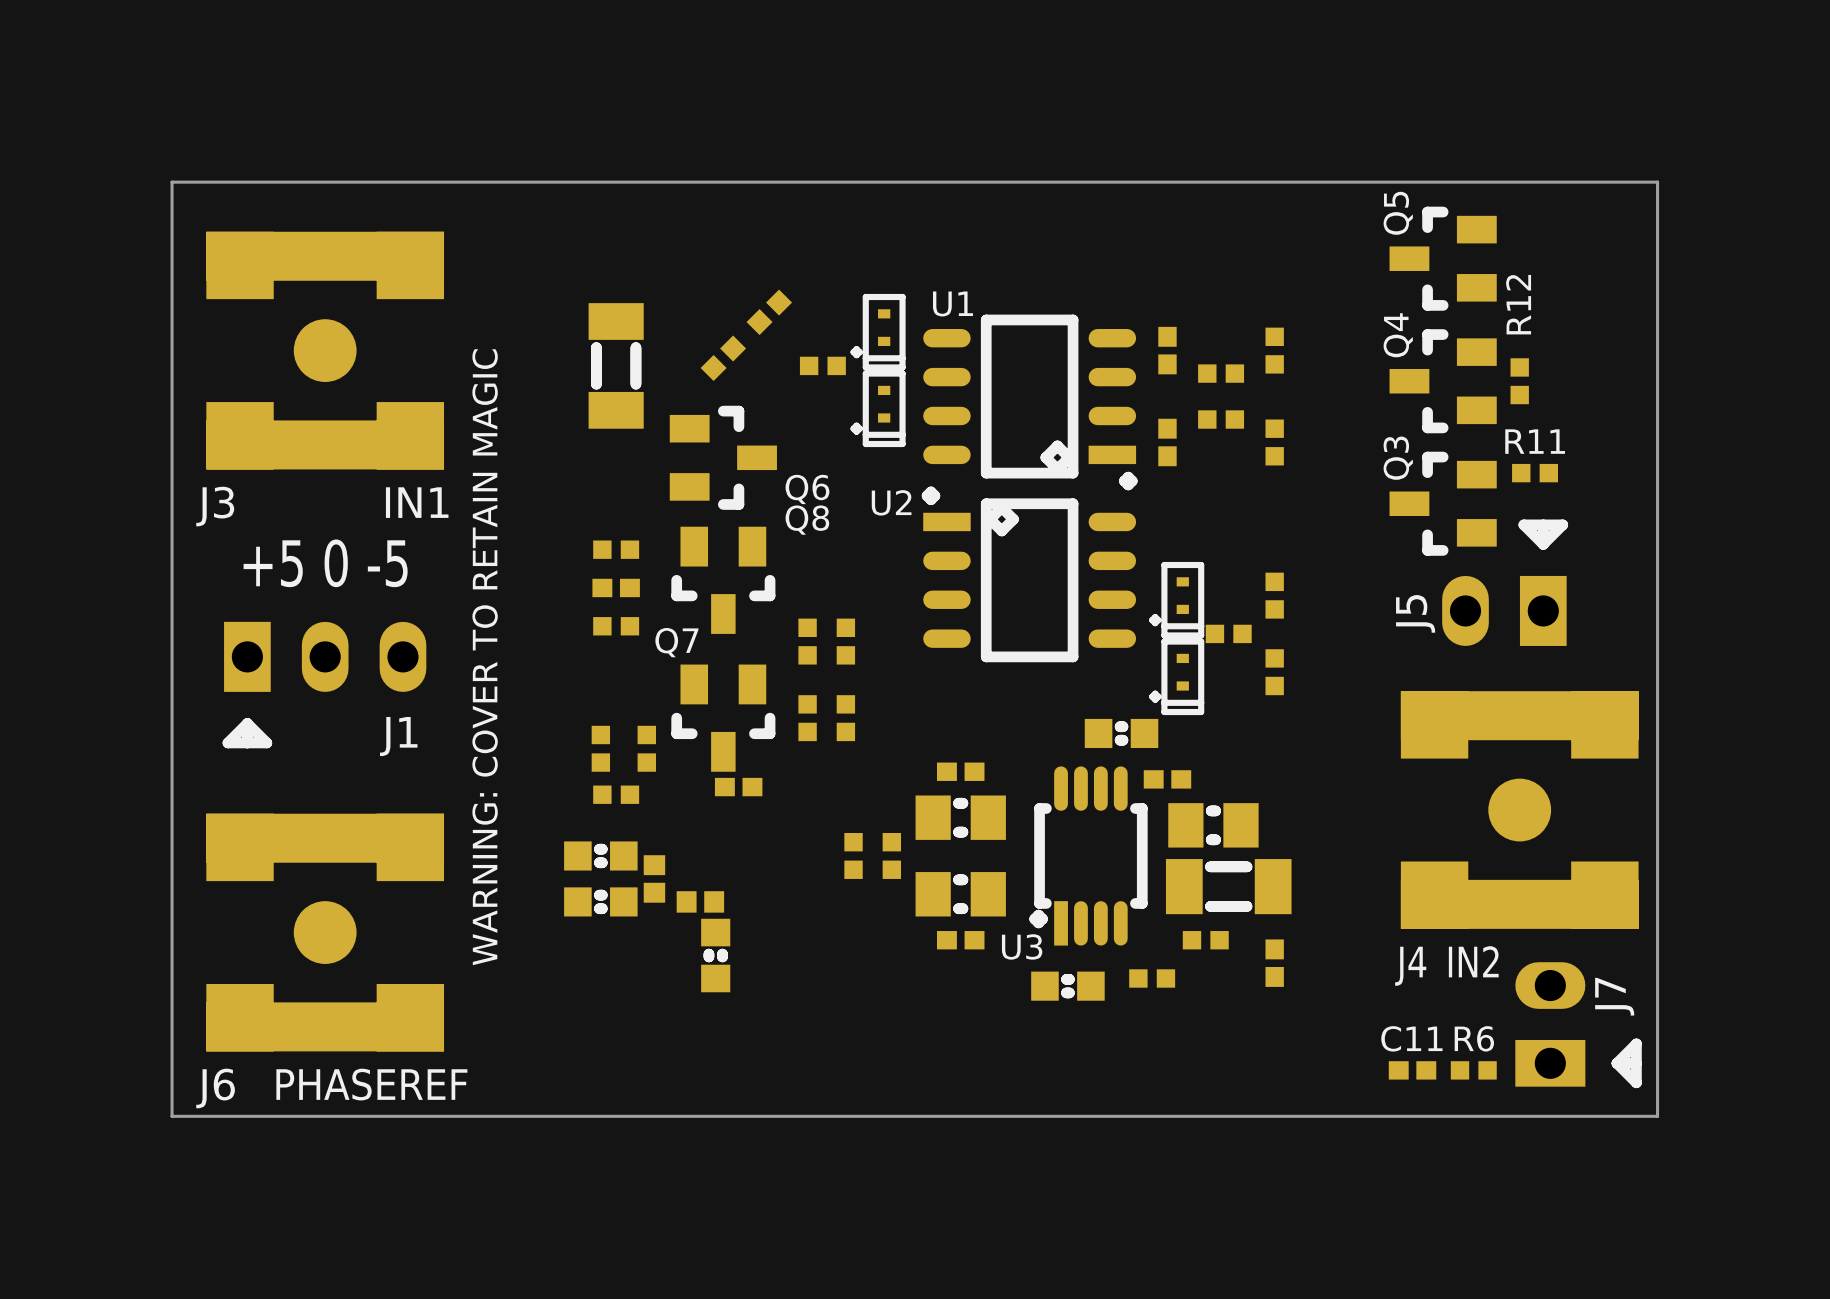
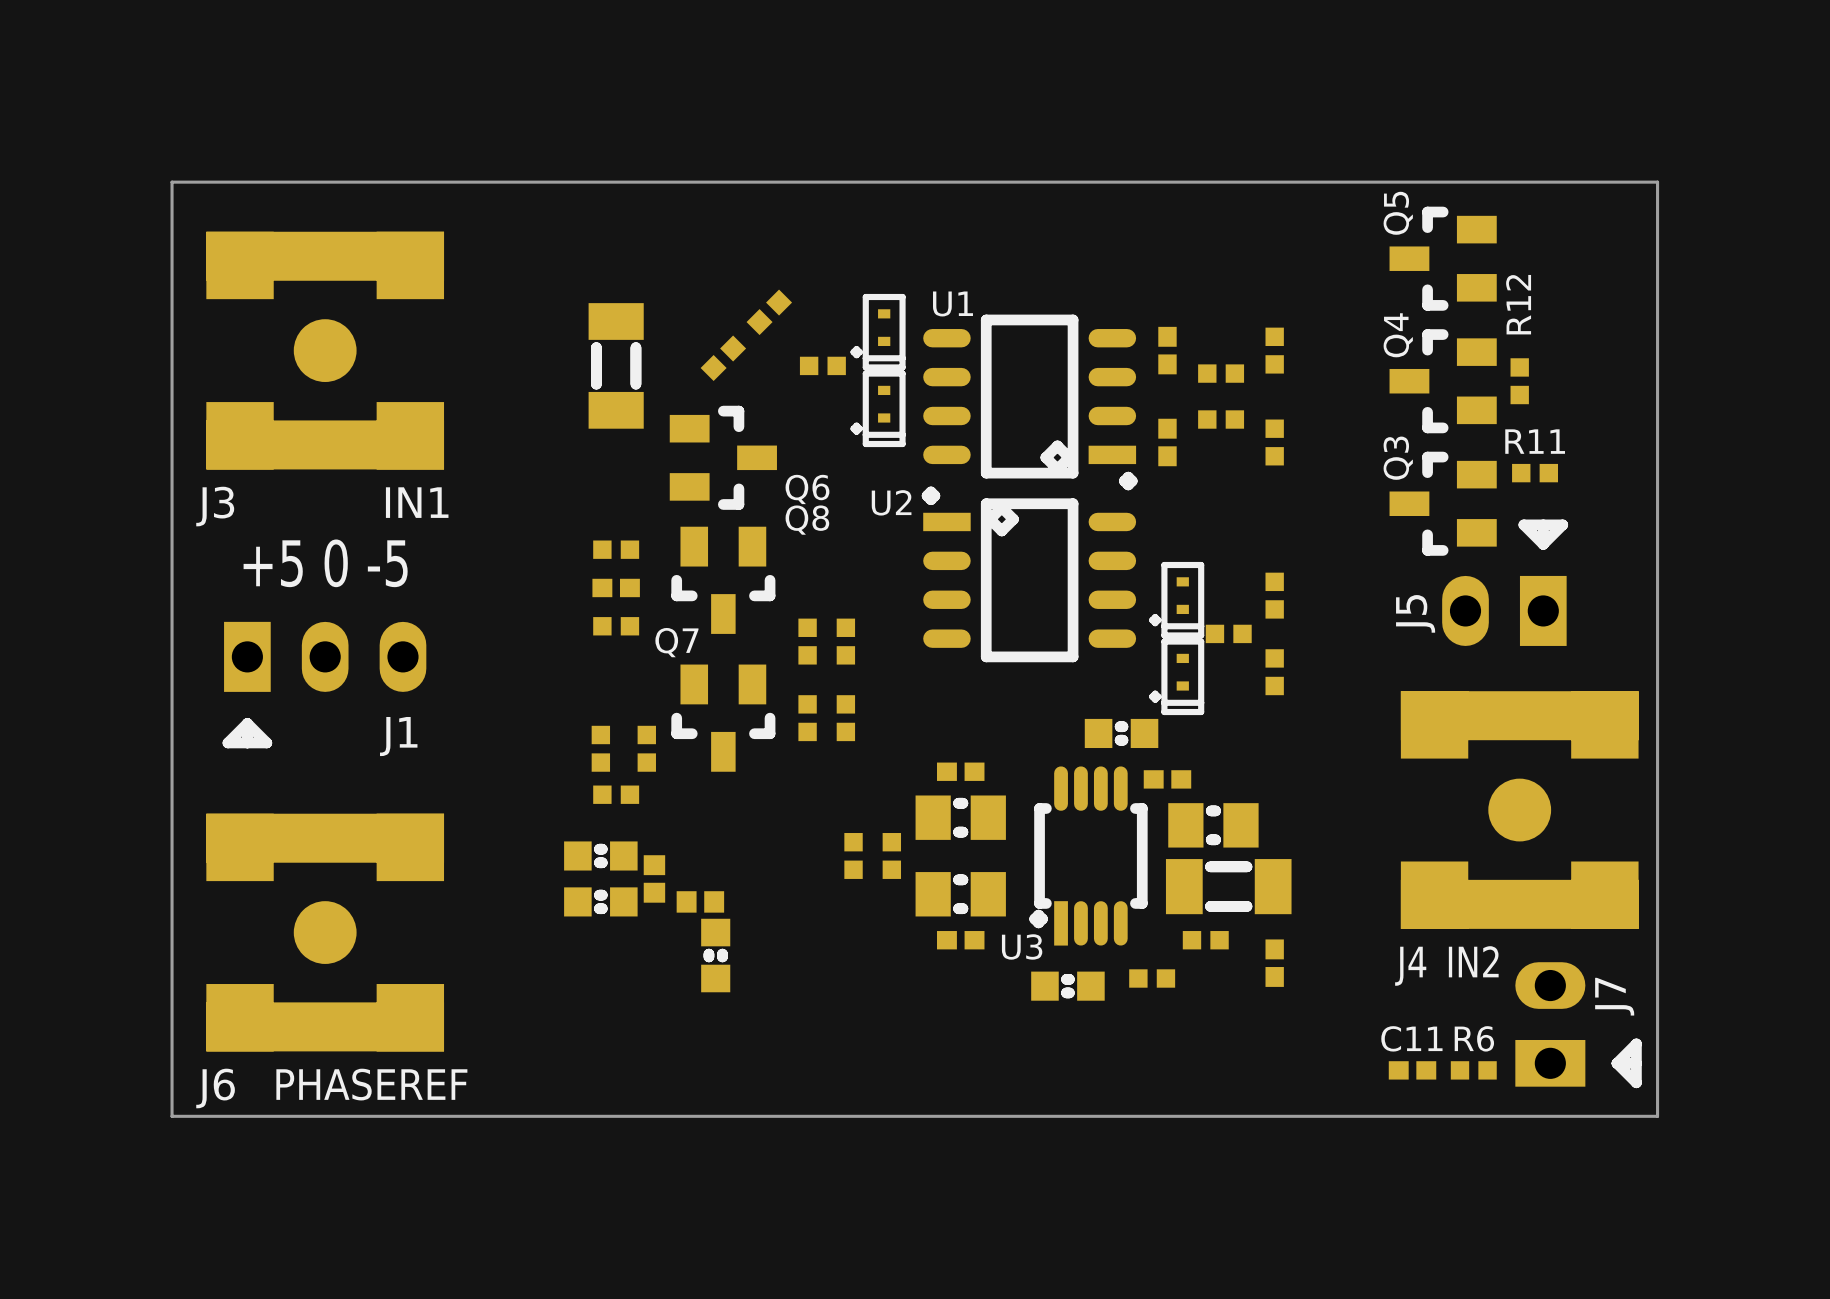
text: WARNING: COVER TO RETAIN MAGIC (485, 657) -> none
part: (738, 787) -> none

